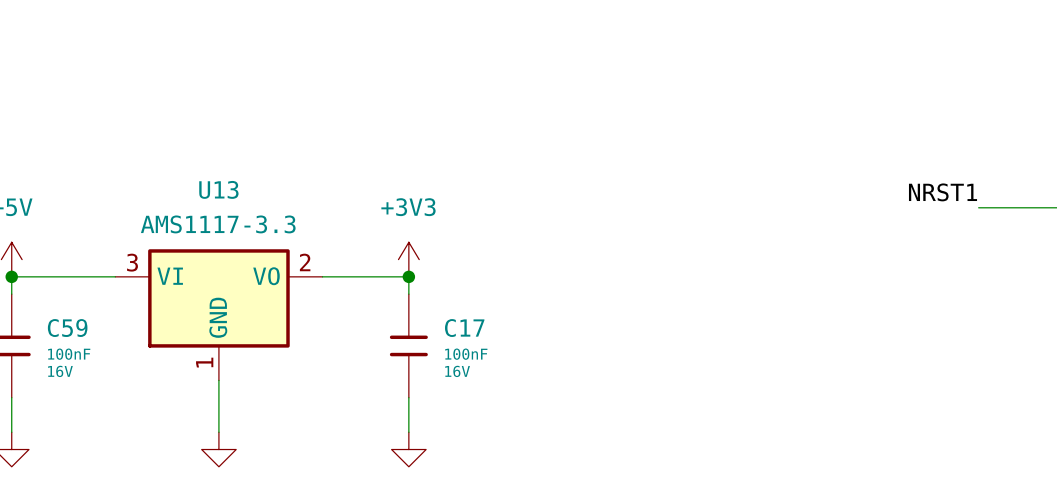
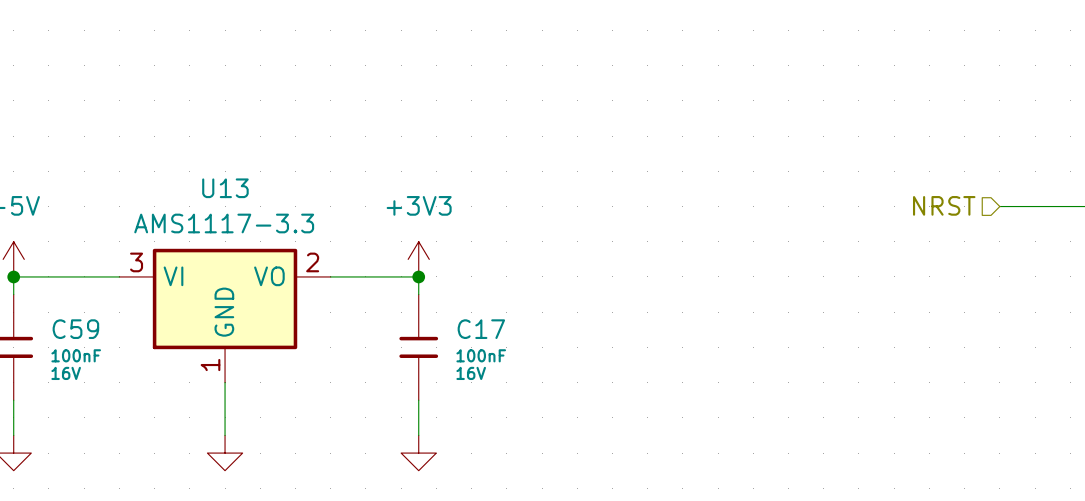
label: NRST1 (943, 192) -> none
hierarchical label: none -> NRST (944, 205)

